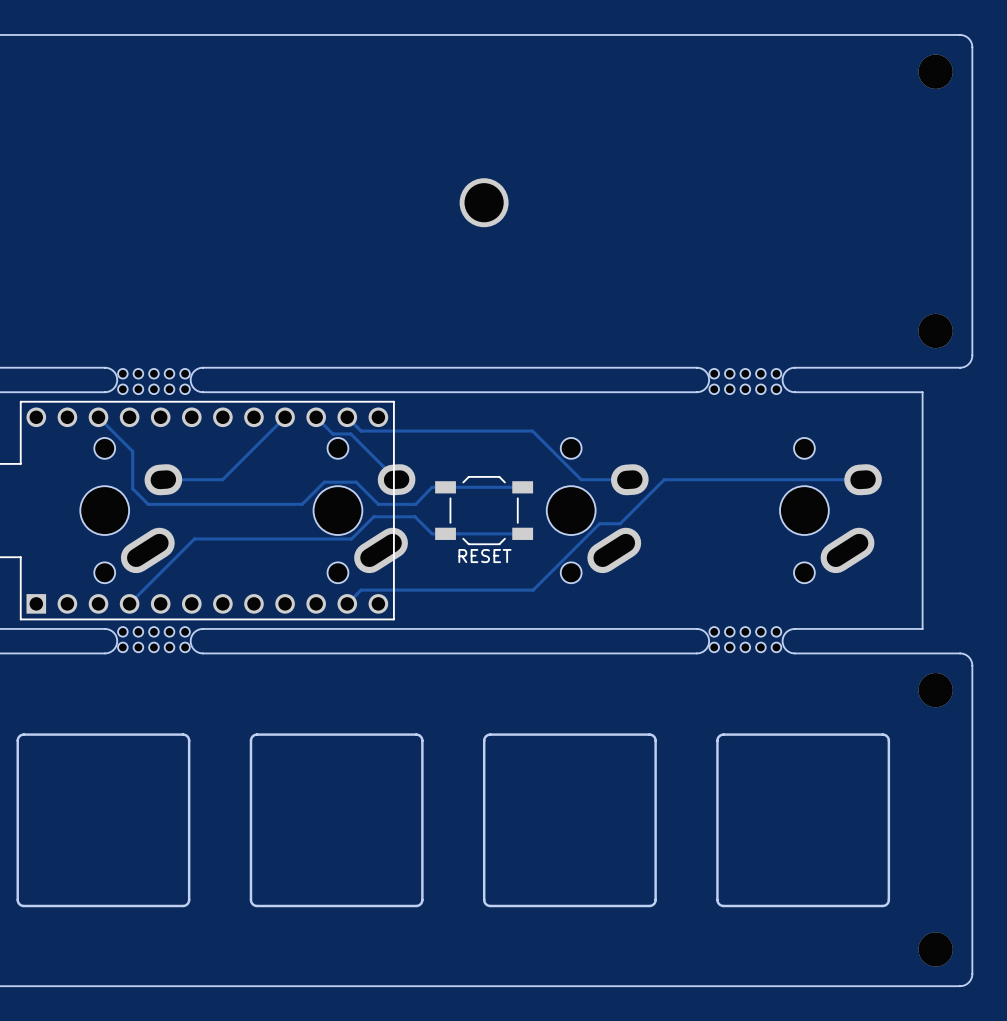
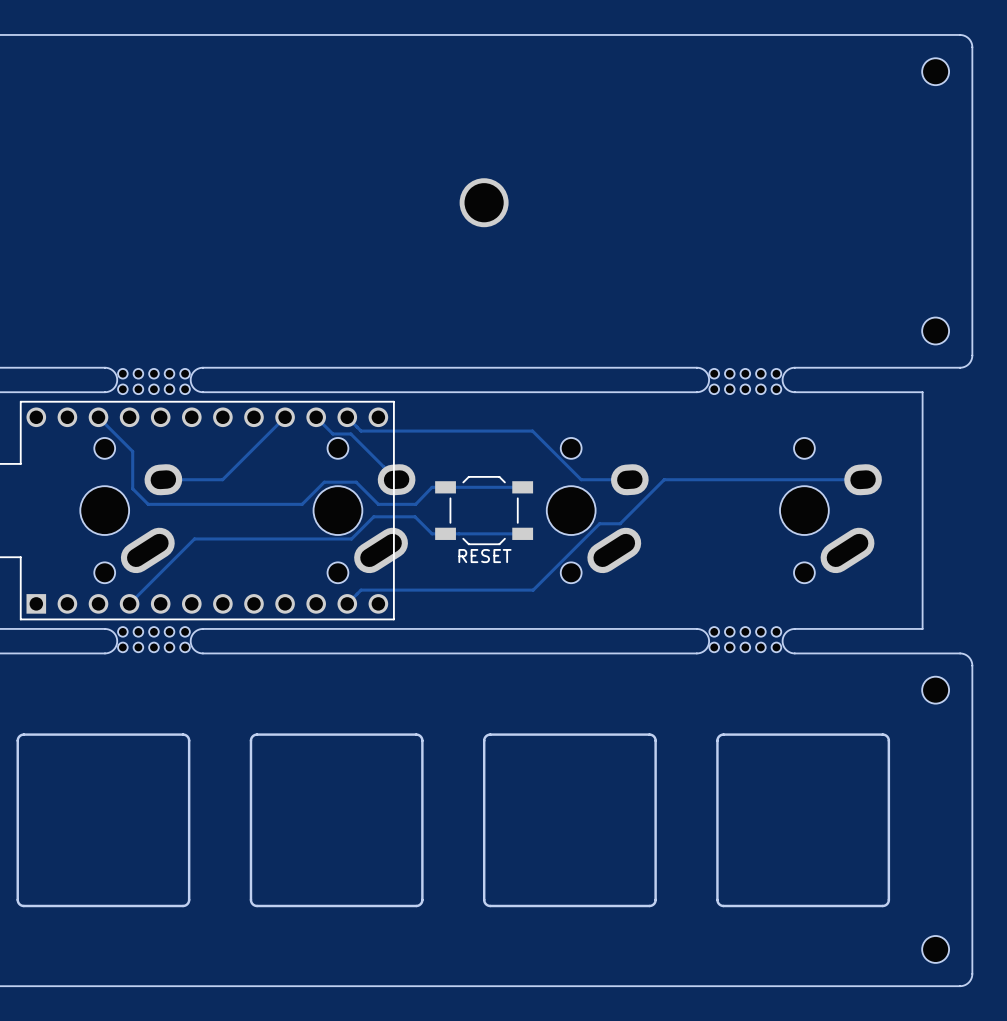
part footprint: [918, 54, 953, 89] -> [922, 58, 950, 86]
part footprint: [918, 313, 953, 349] -> [922, 317, 950, 345]
part footprint: [918, 673, 953, 708] -> [922, 676, 950, 704]
part footprint: [918, 932, 953, 967] -> [922, 935, 950, 963]

